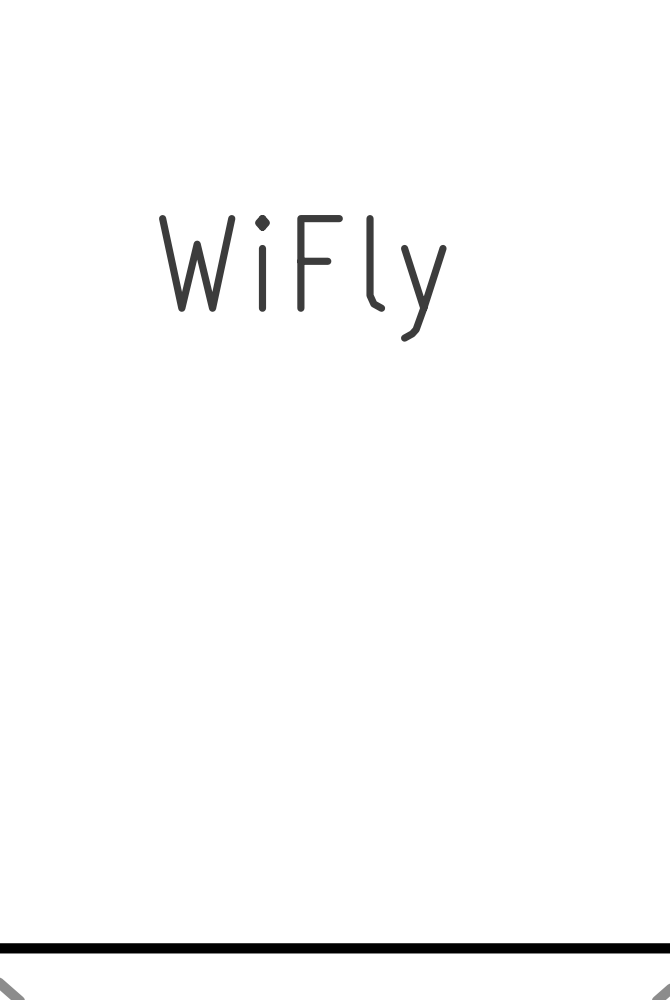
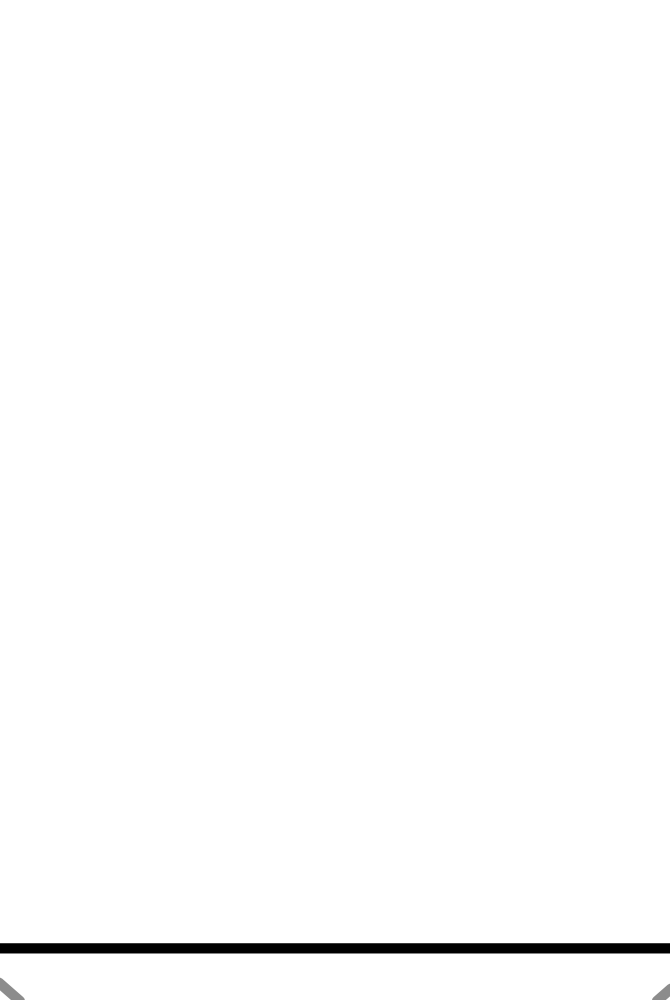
text: WiFly (302, 278) -> none

